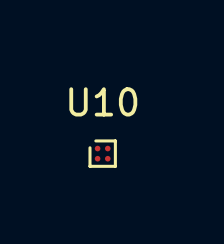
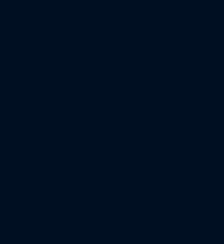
U10: (102, 153) -> none

